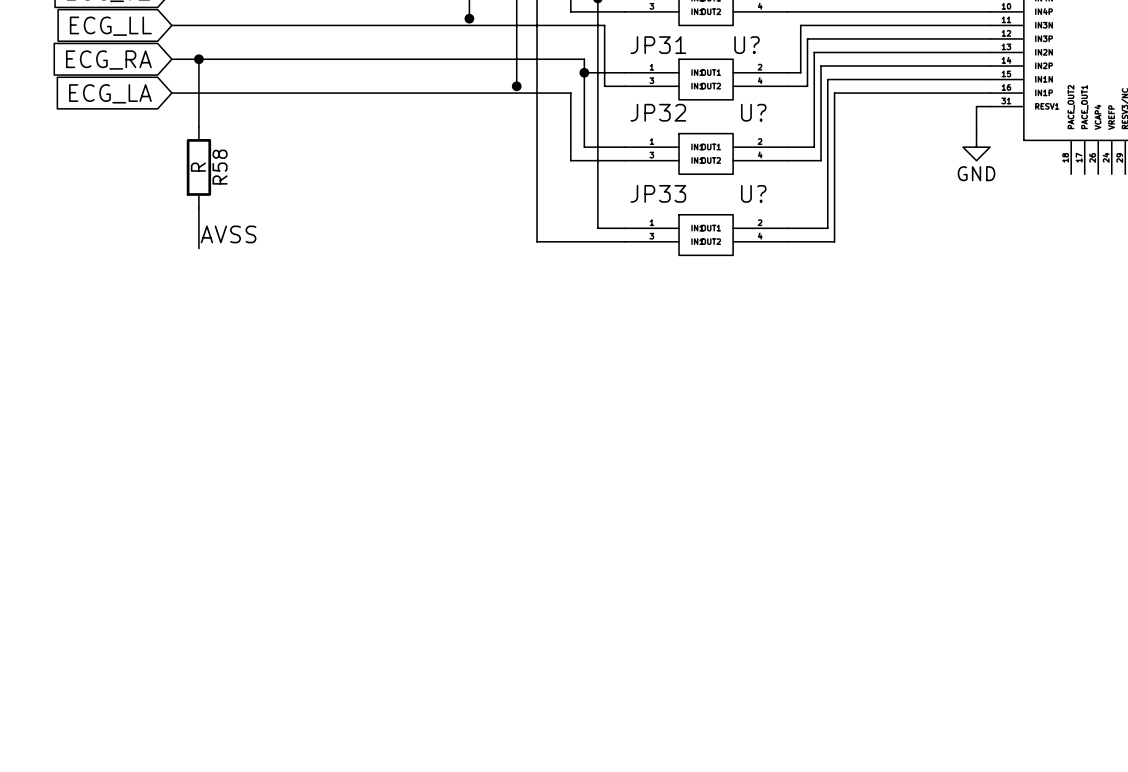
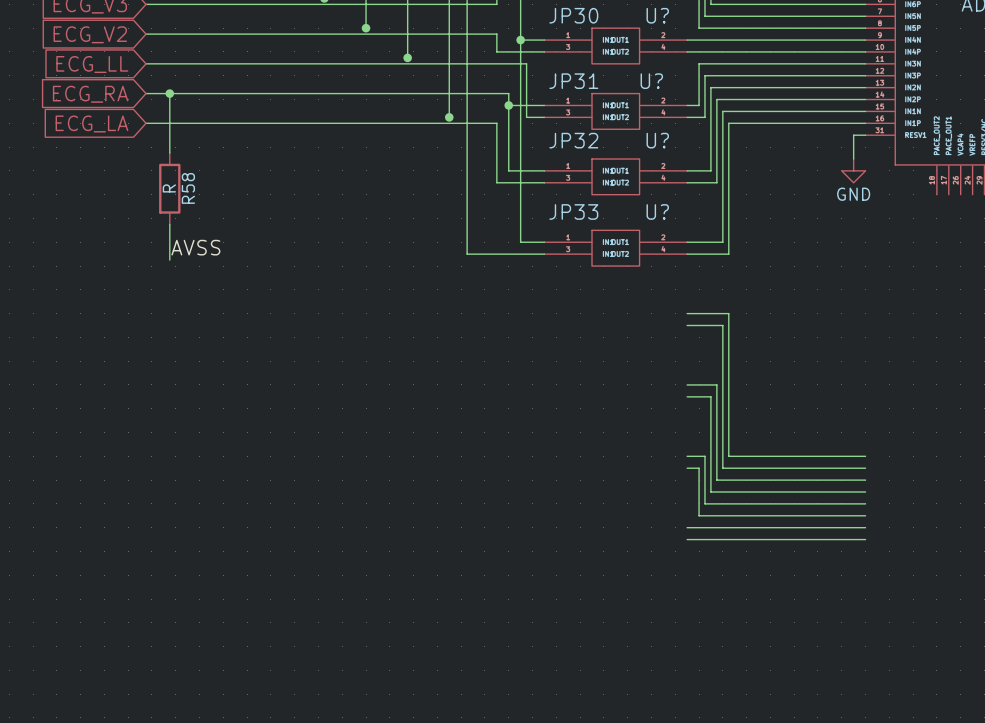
wire: none -> (687, 313) (728, 313) (728, 456) (865, 456)
wire: none -> (687, 325) (722, 325) (722, 468) (865, 468)
wire: none -> (687, 384) (716, 384) (716, 480) (865, 480)
wire: none -> (687, 396) (710, 396) (710, 492) (865, 492)
wire: none -> (687, 456) (704, 456) (704, 503) (865, 503)
wire: none -> (687, 468) (699, 468) (699, 515) (865, 515)
wire: none -> (687, 527) (865, 527)
wire: none -> (687, 539) (865, 539)

